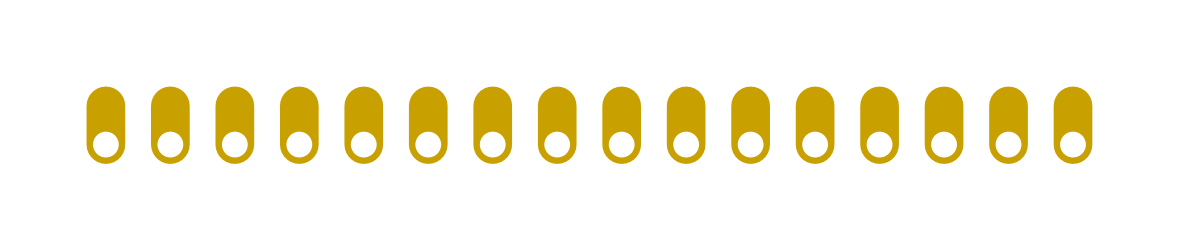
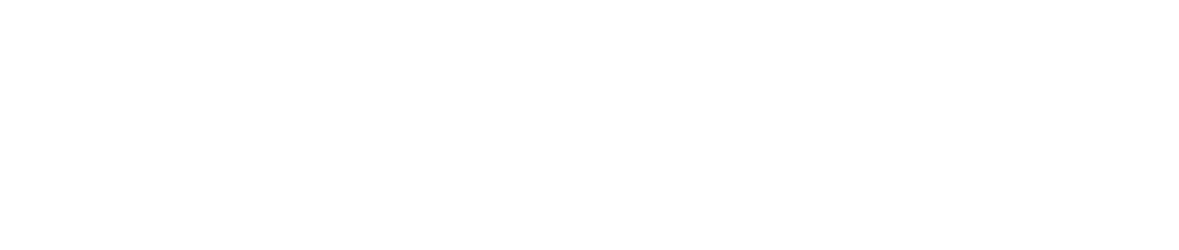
part: (589, 125) -> none

